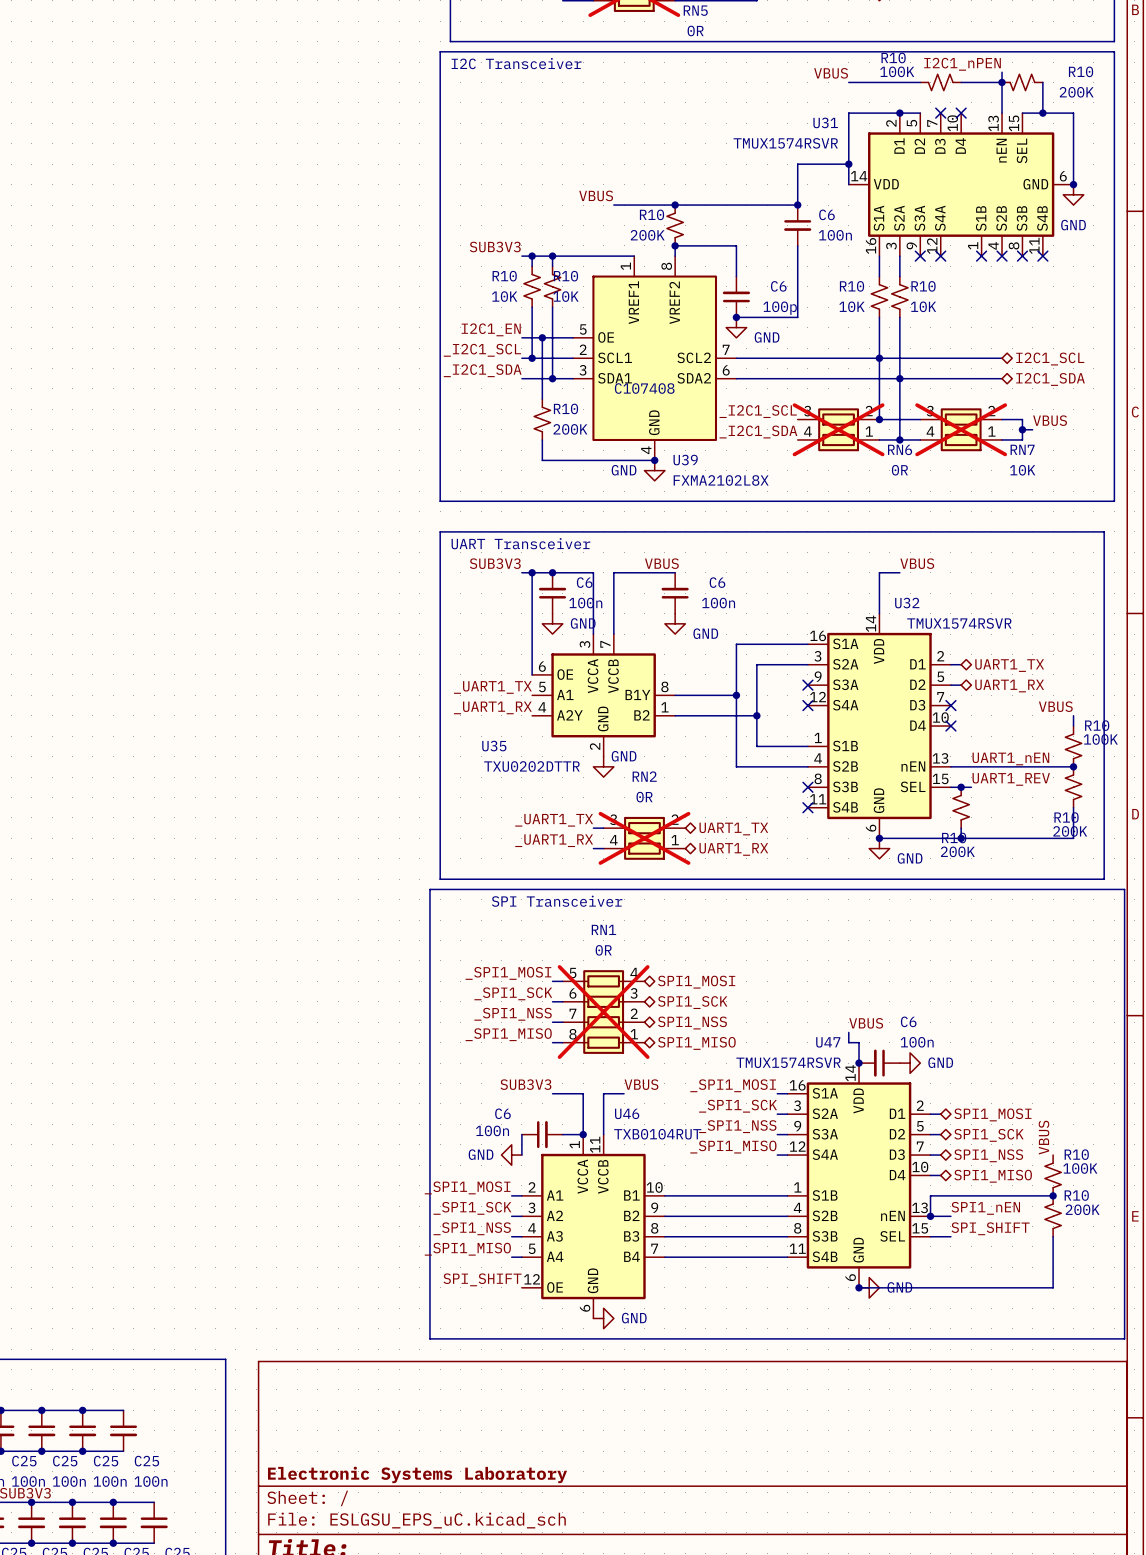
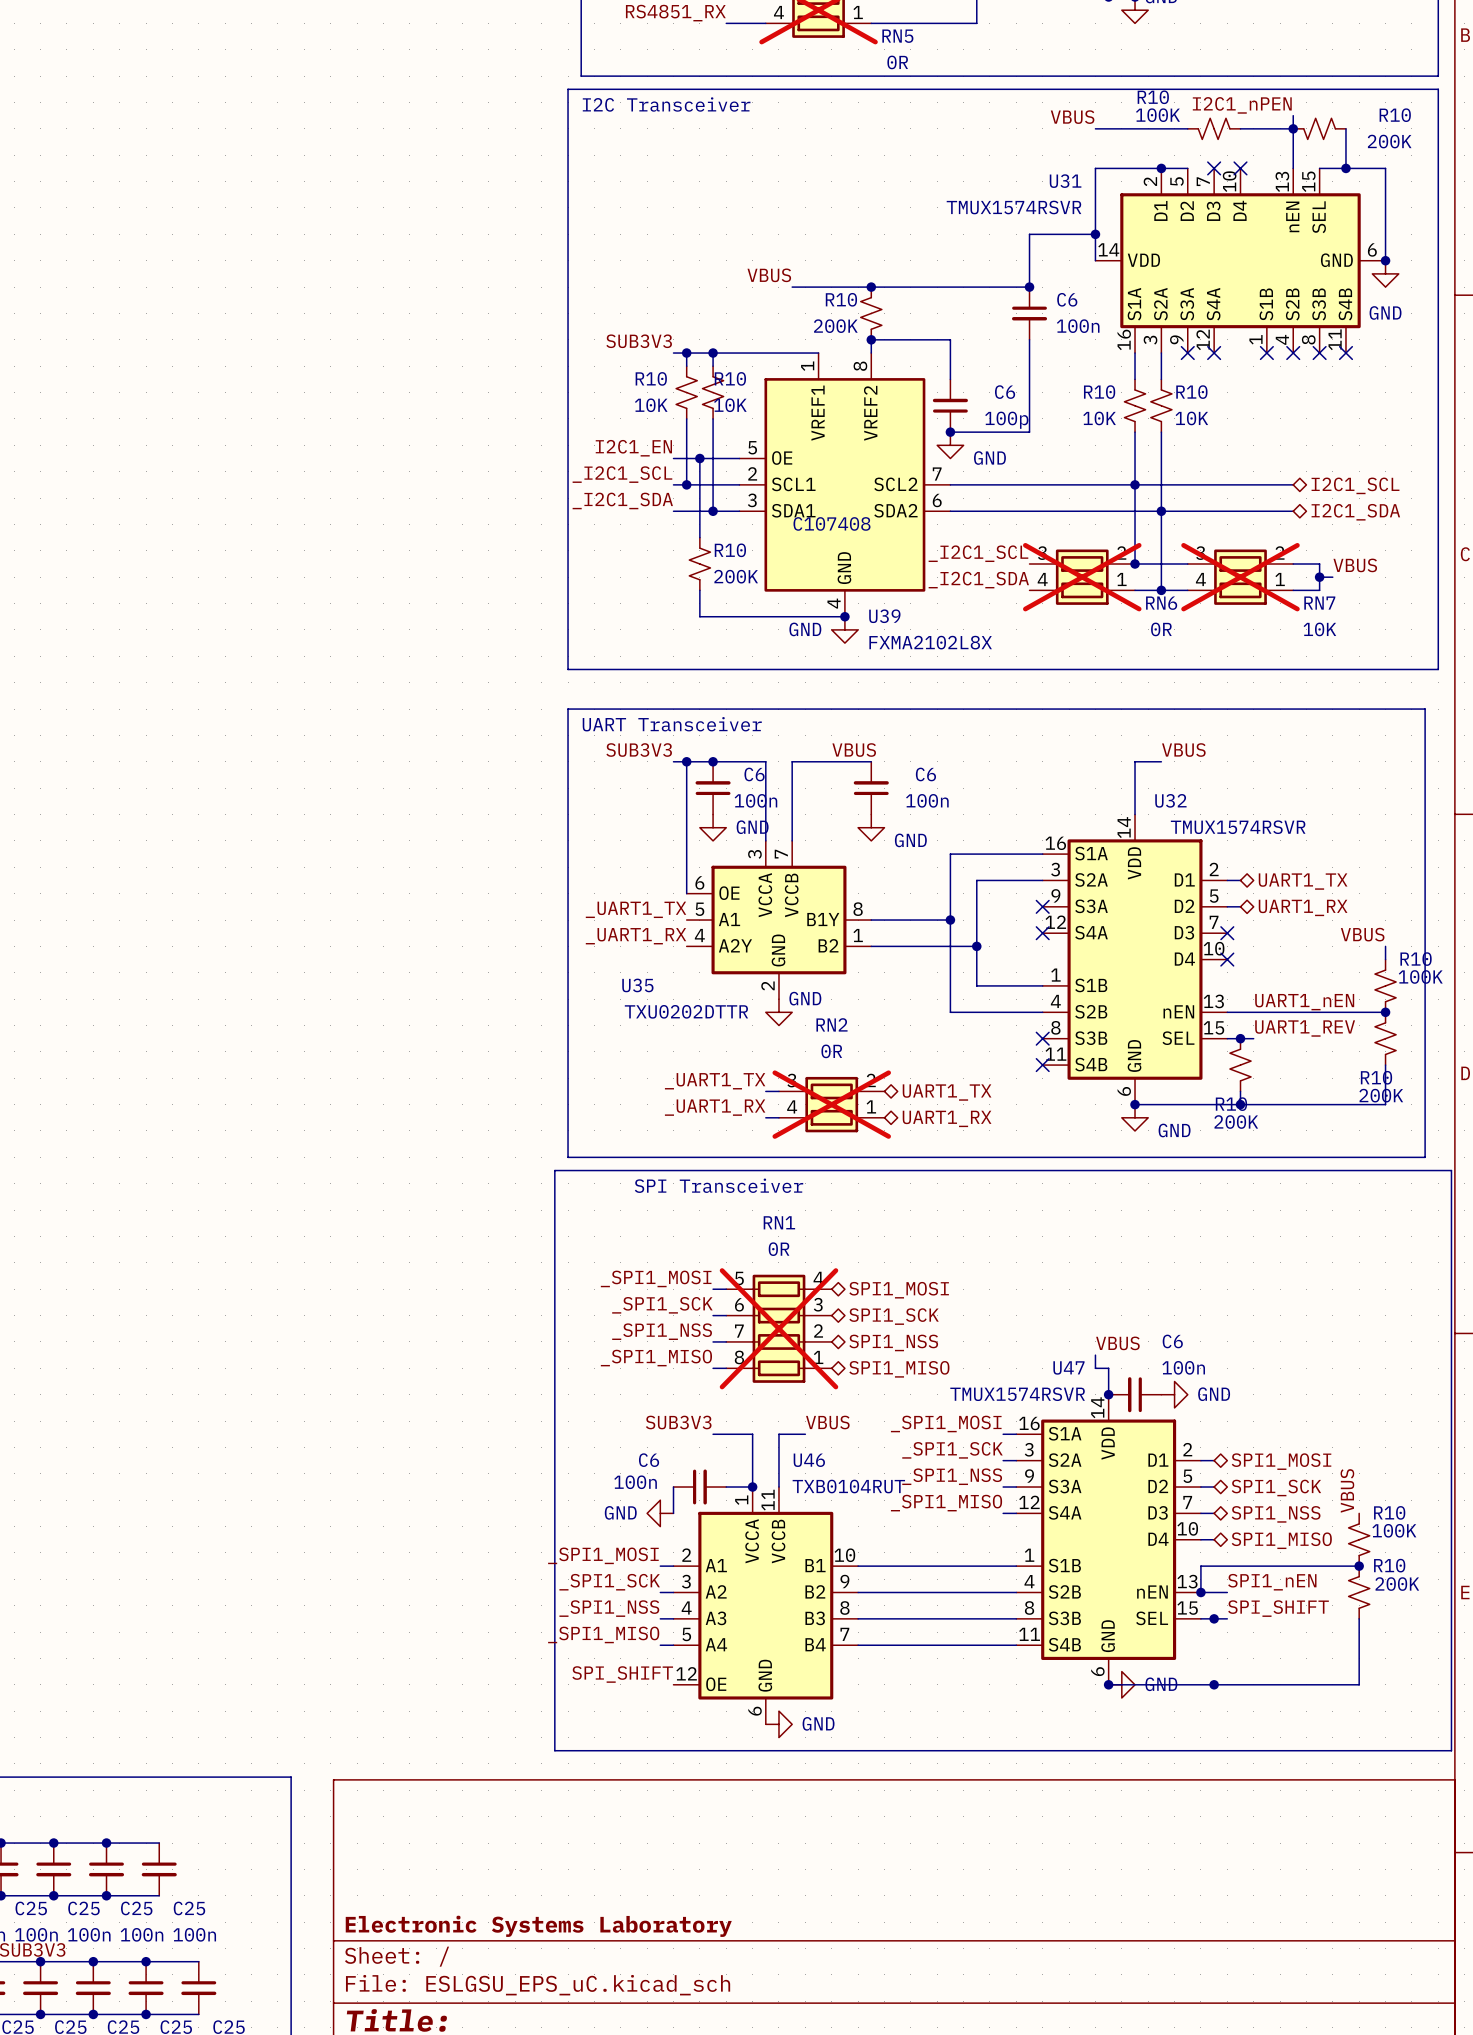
junction: none -> (1214, 1618)
junction: none -> (1214, 1684)

